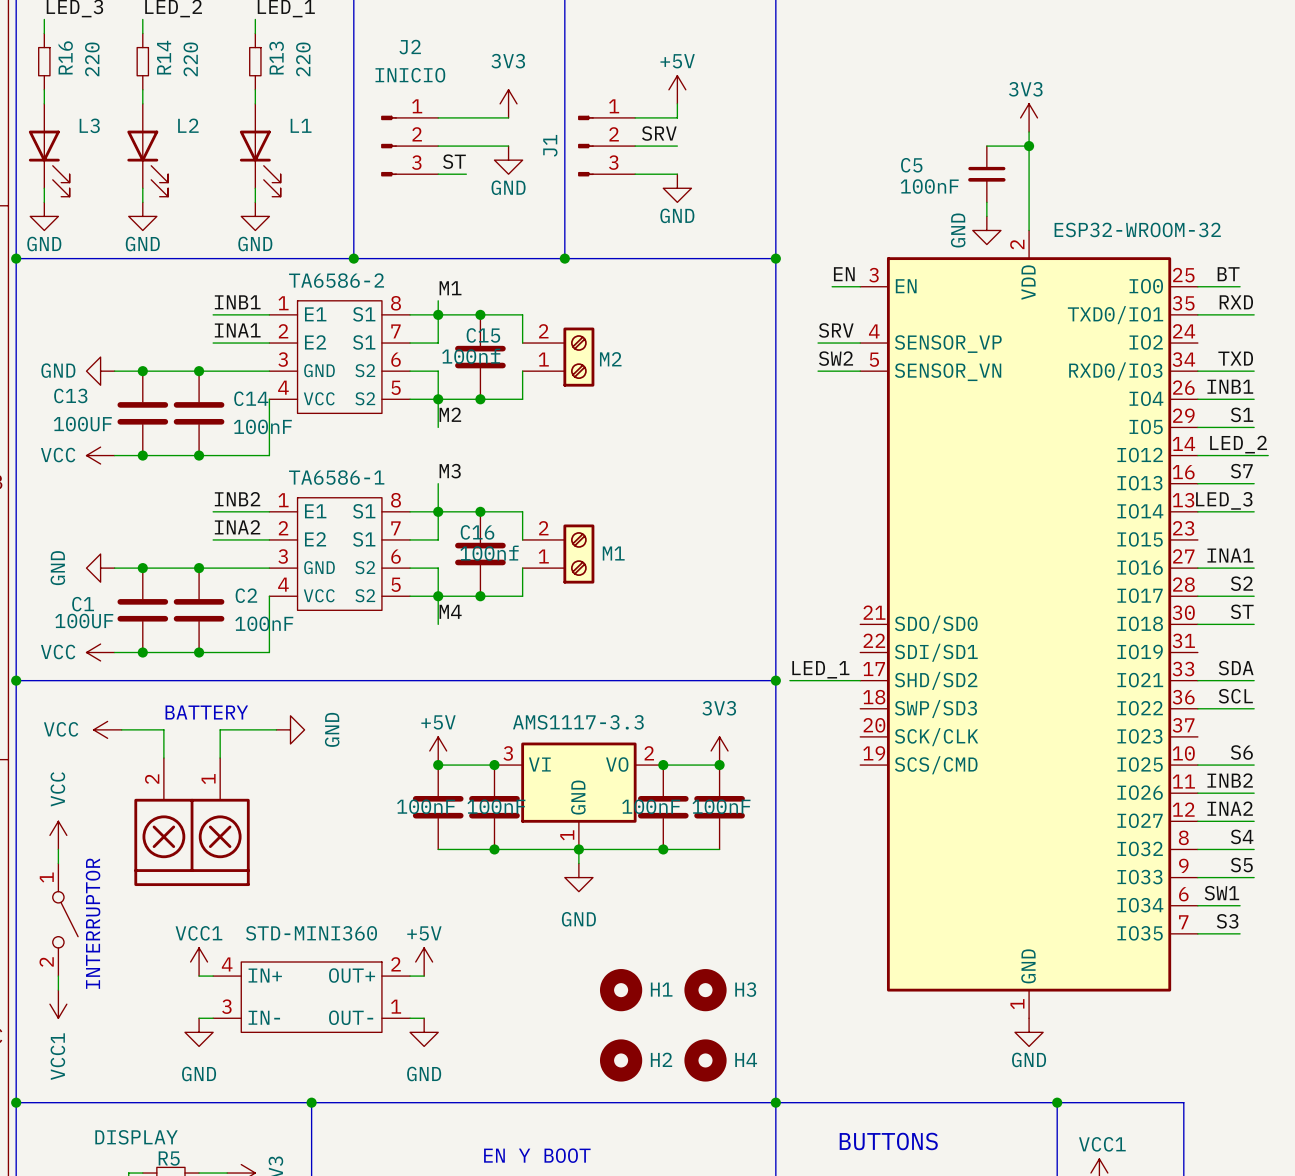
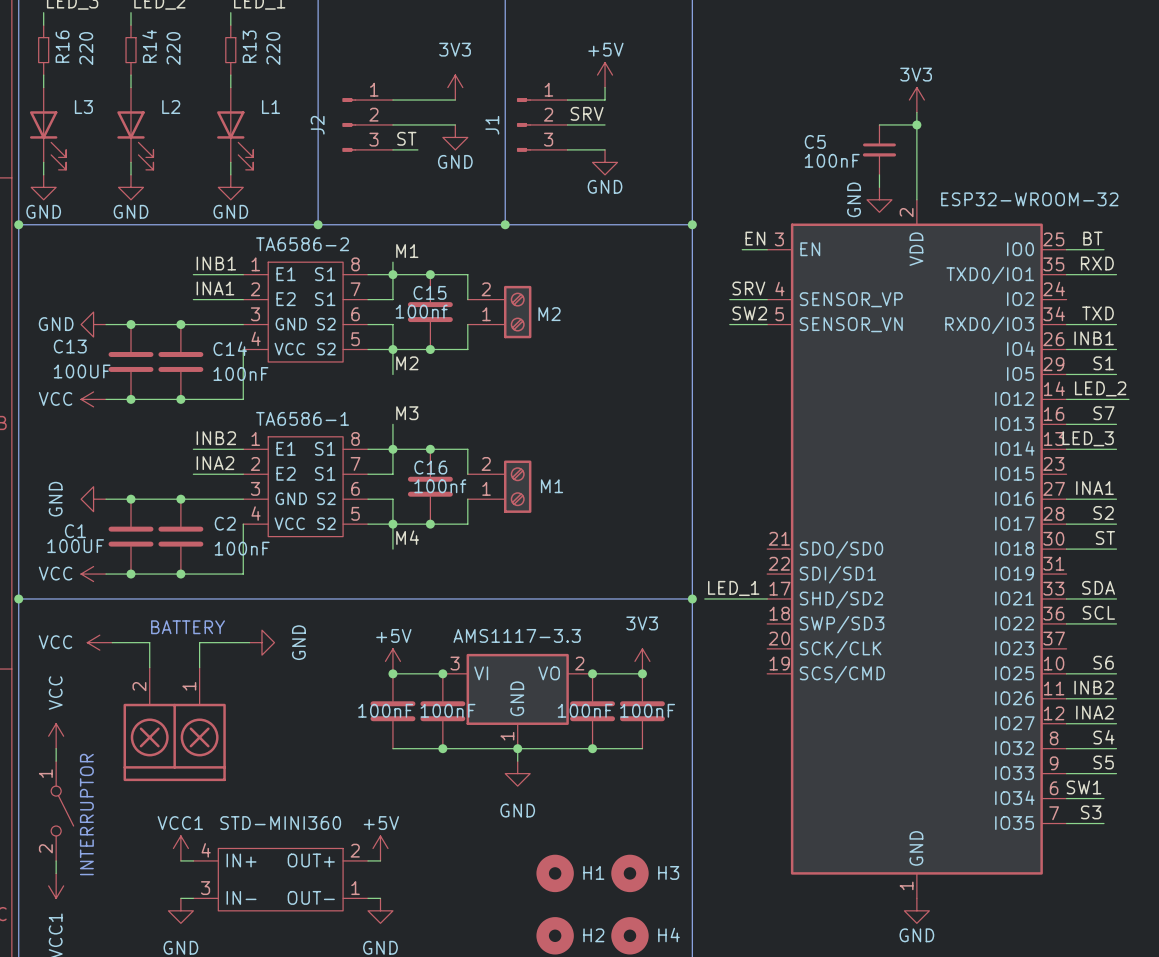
J2 name rotation: 0° (410, 47) -> 90° counterclockwise (317, 125)
J2 name position: J2 (410, 47) -> J2 (317, 125)
J2 value: INICIO (410, 75) -> none

